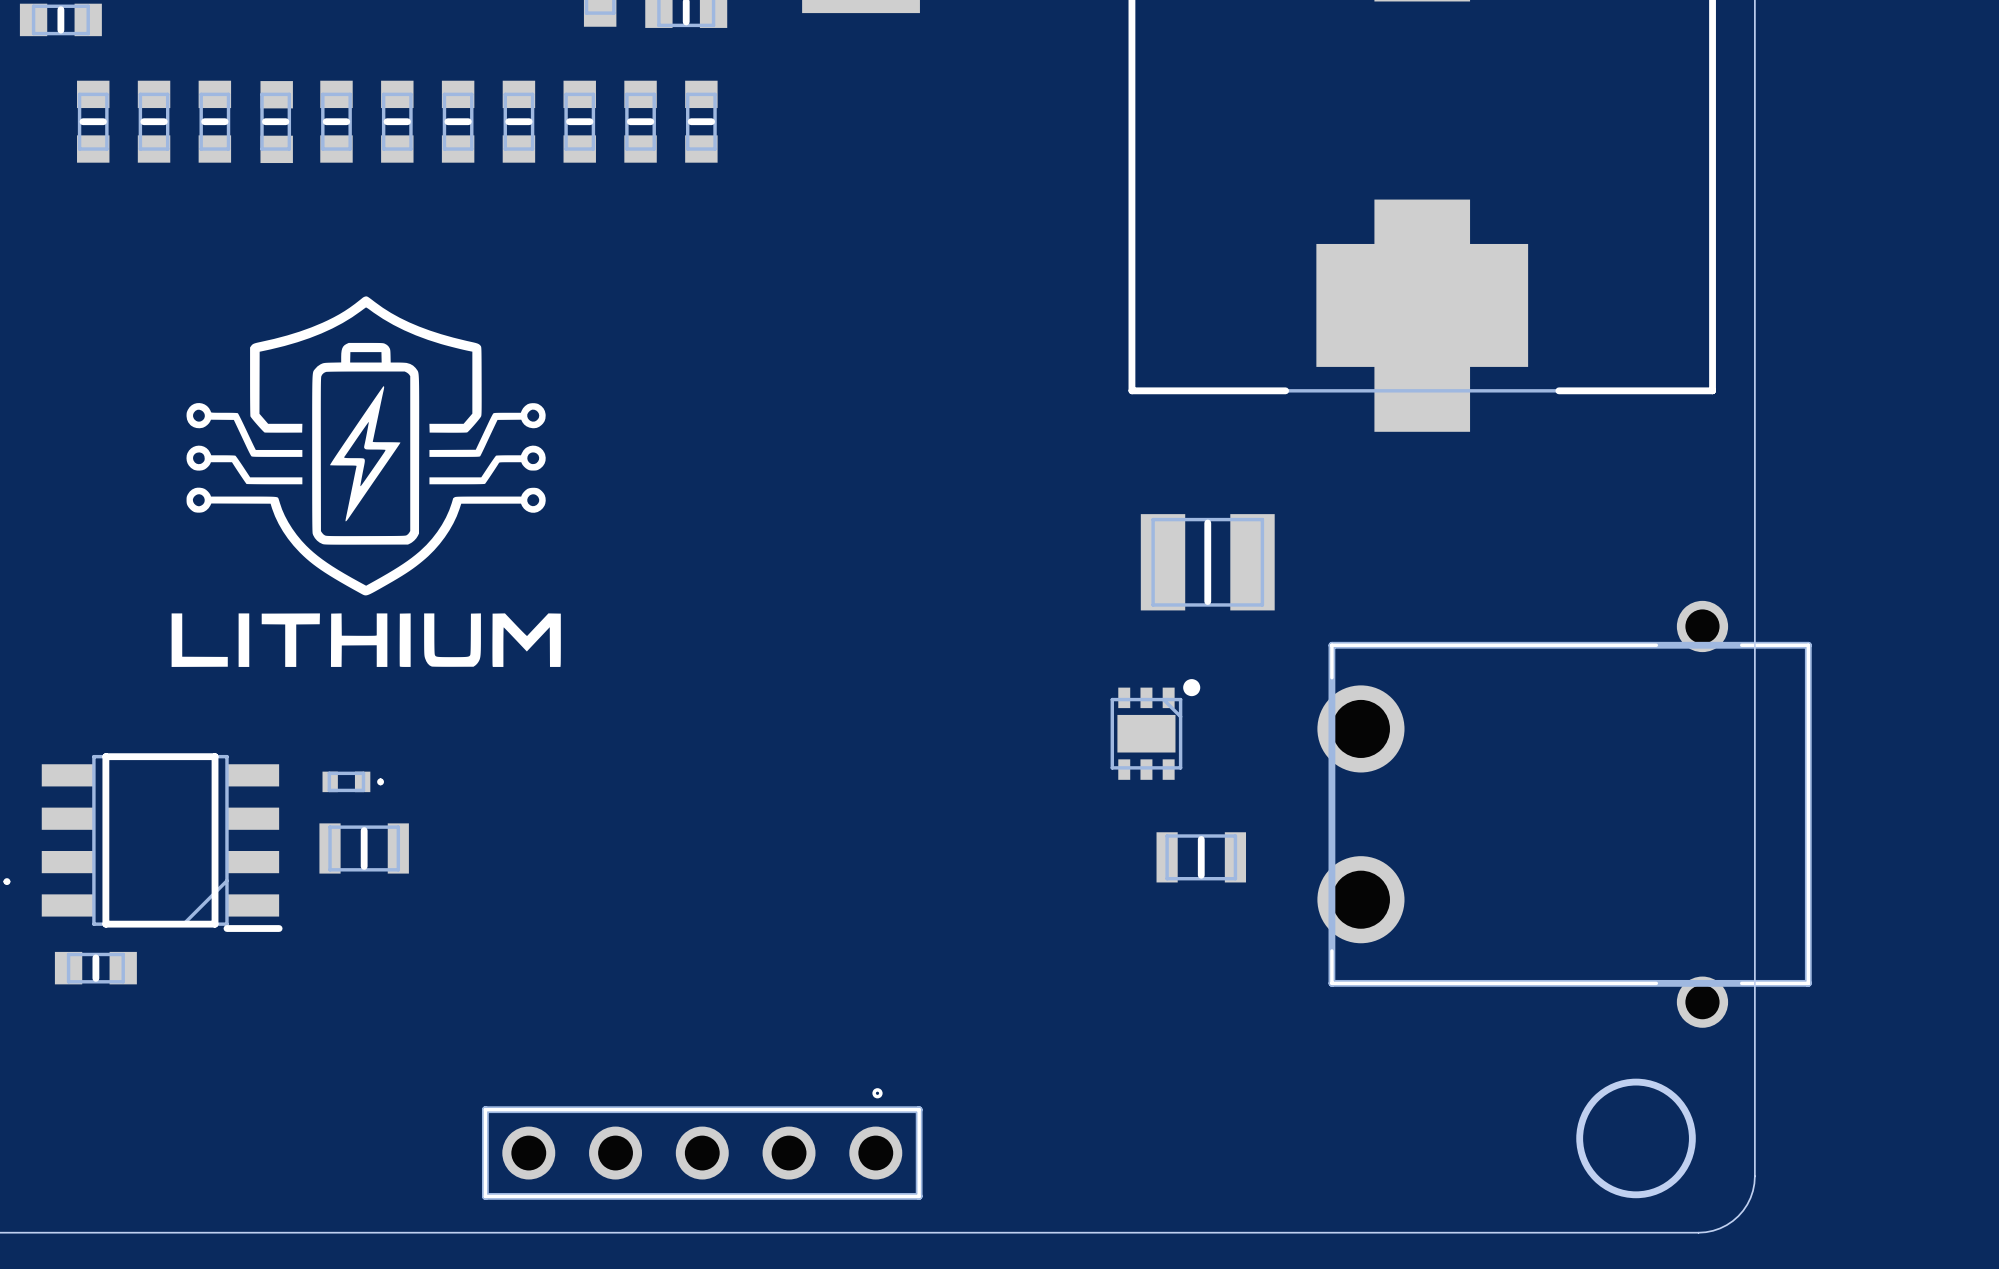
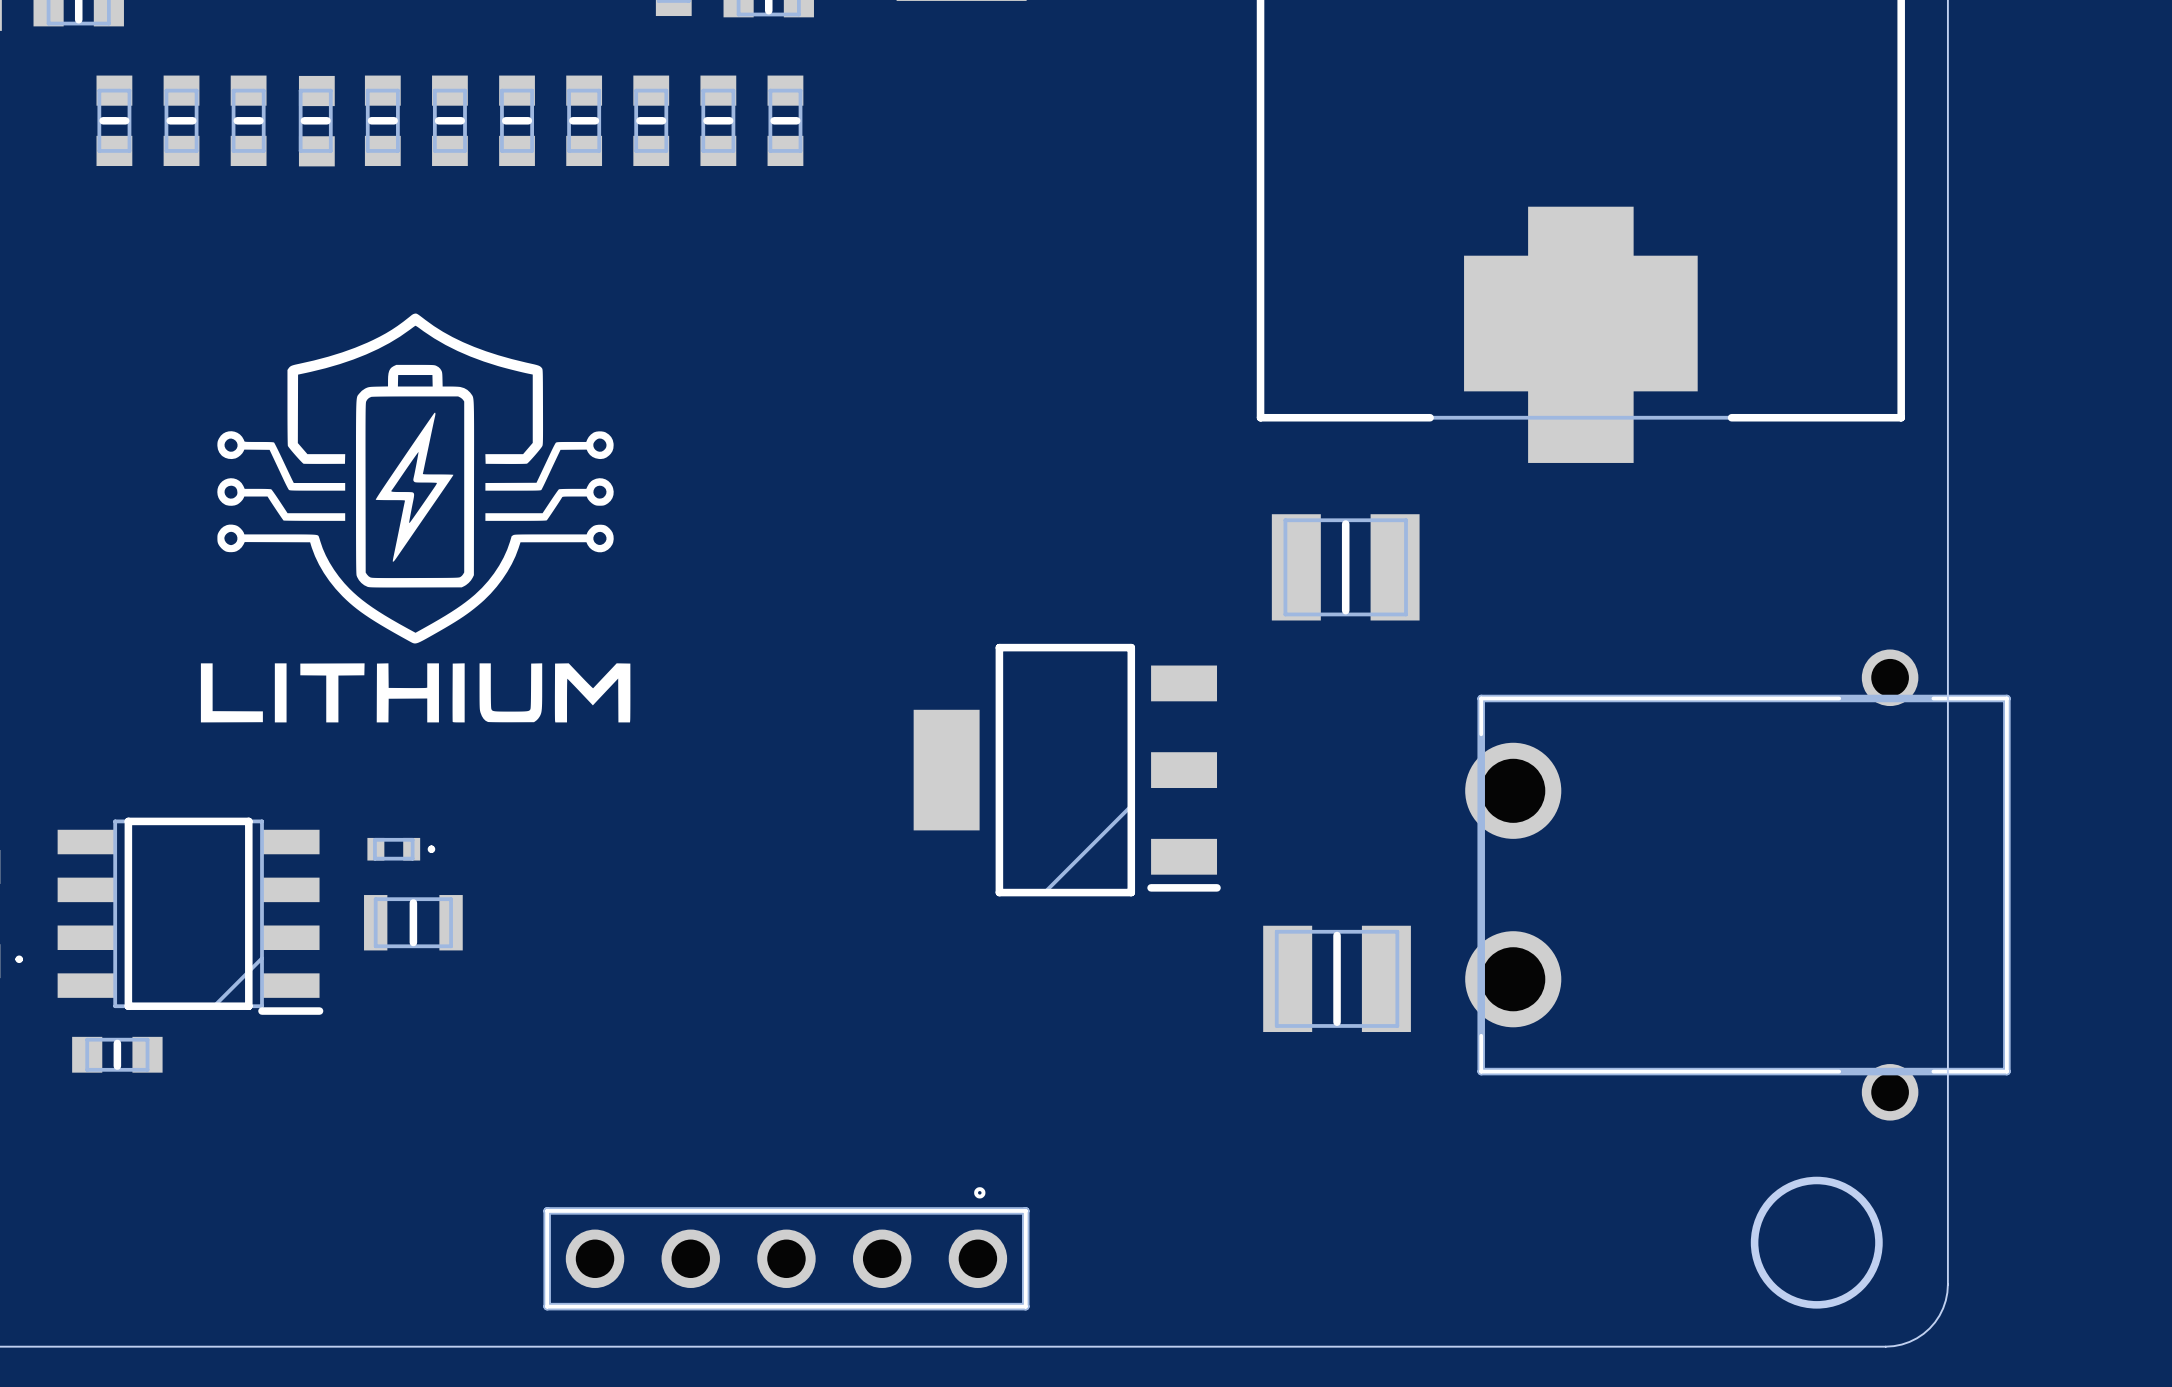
part position: (1207, 562) -> (1345, 567)
part: none -> (1067, 770)
part: (1155, 729) -> none
part: (1201, 857) -> none
part: none -> (1337, 978)

